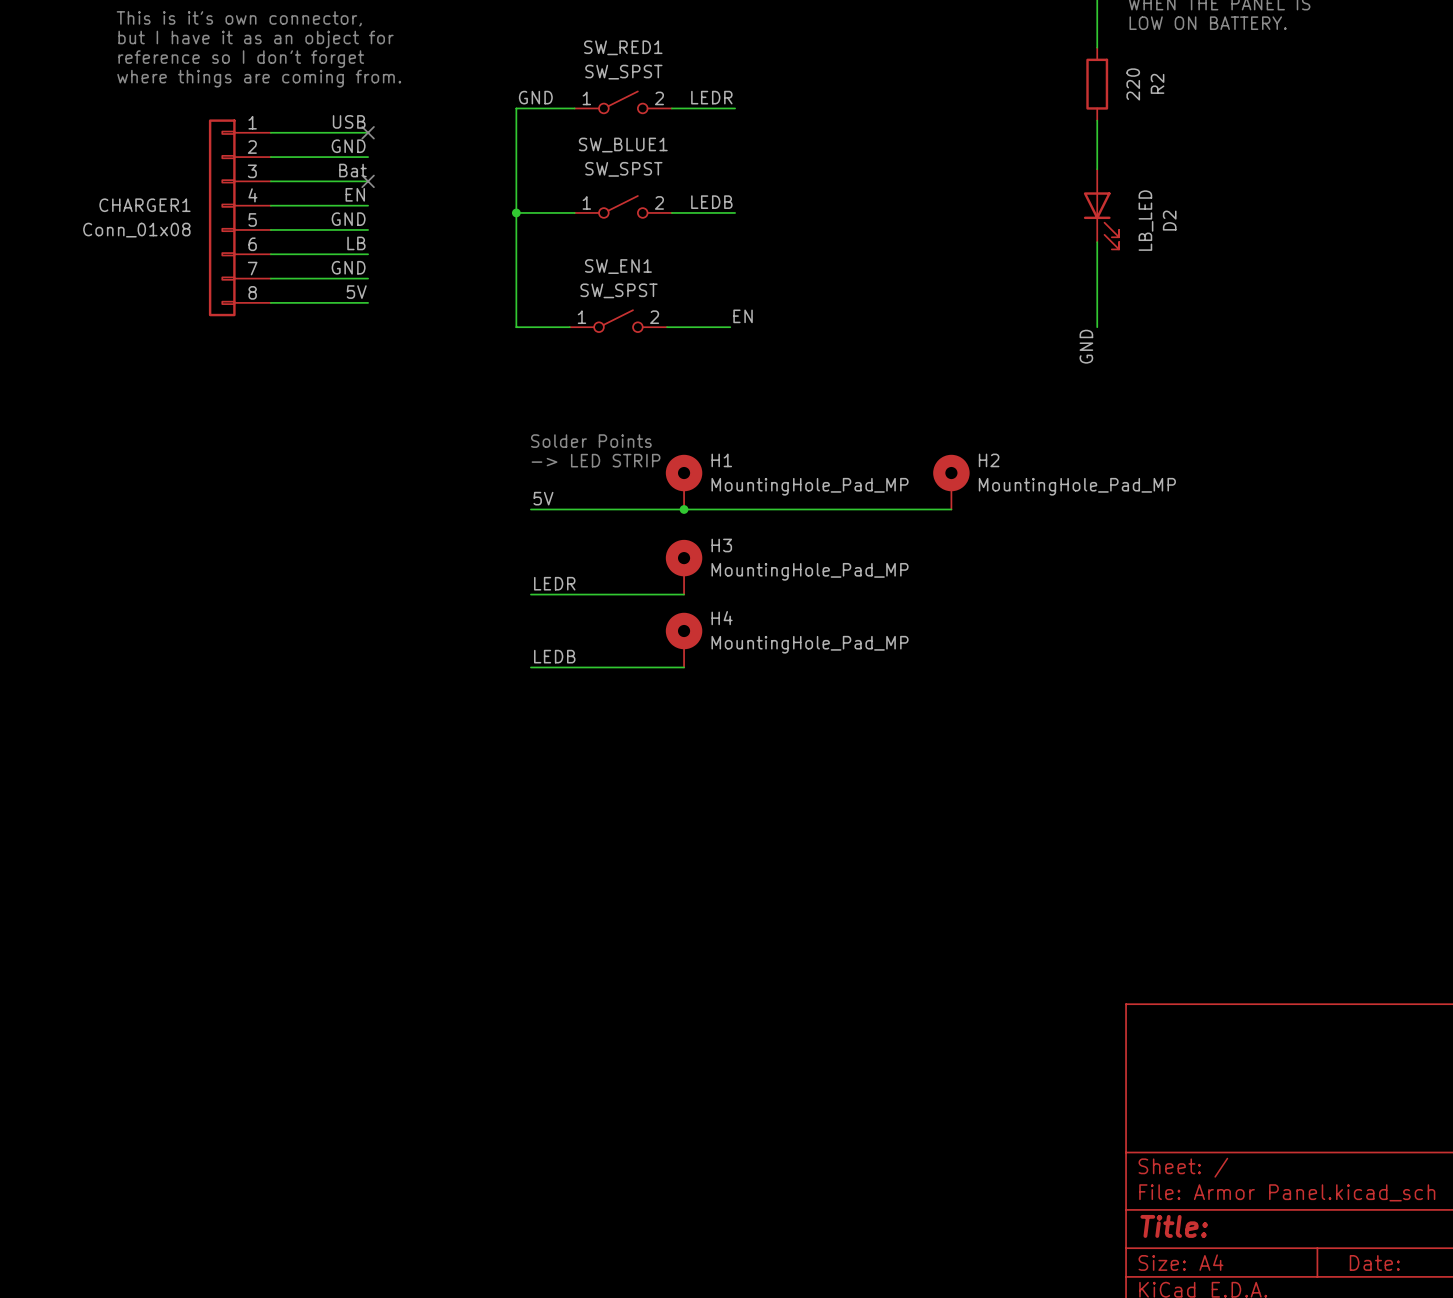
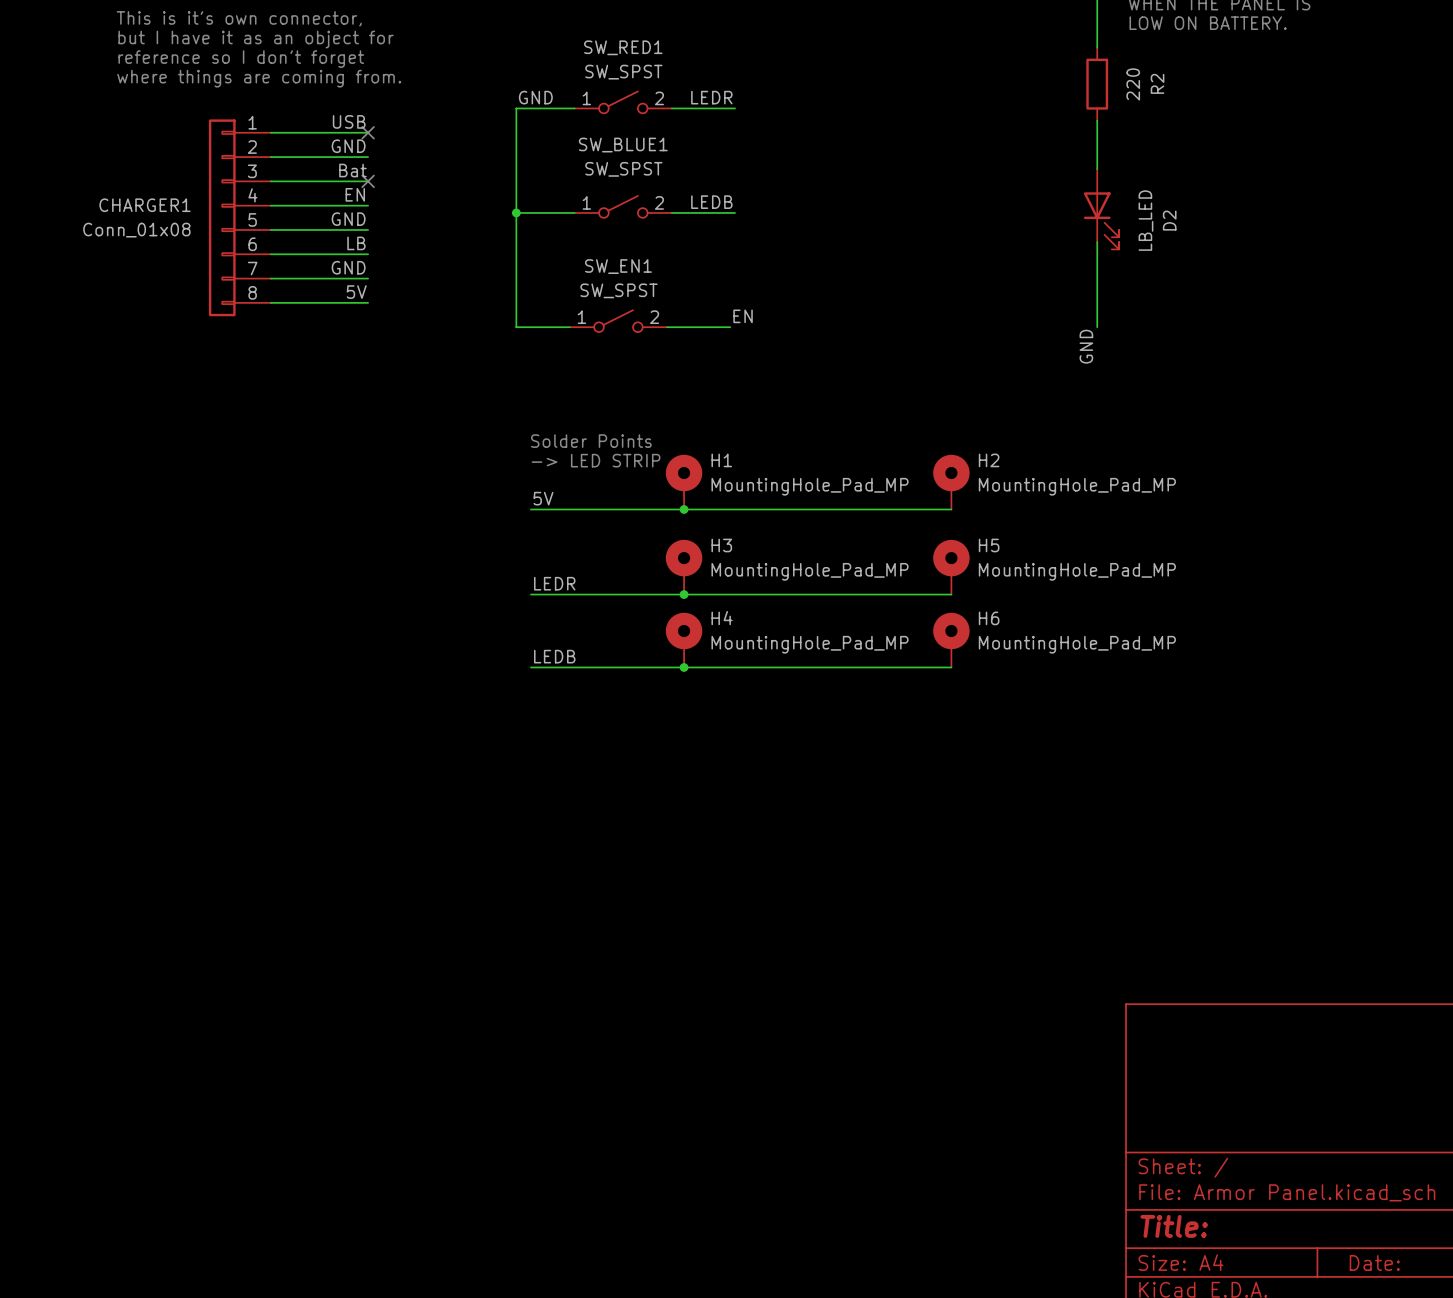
H5: none -> MountingHole_Pad_MP (951, 567)
wire: none -> (684, 594) (951, 594)
junction: none -> (684, 594)
H6: none -> MountingHole_Pad_MP (951, 640)
wire: none -> (684, 667) (951, 667)
junction: none -> (684, 667)

